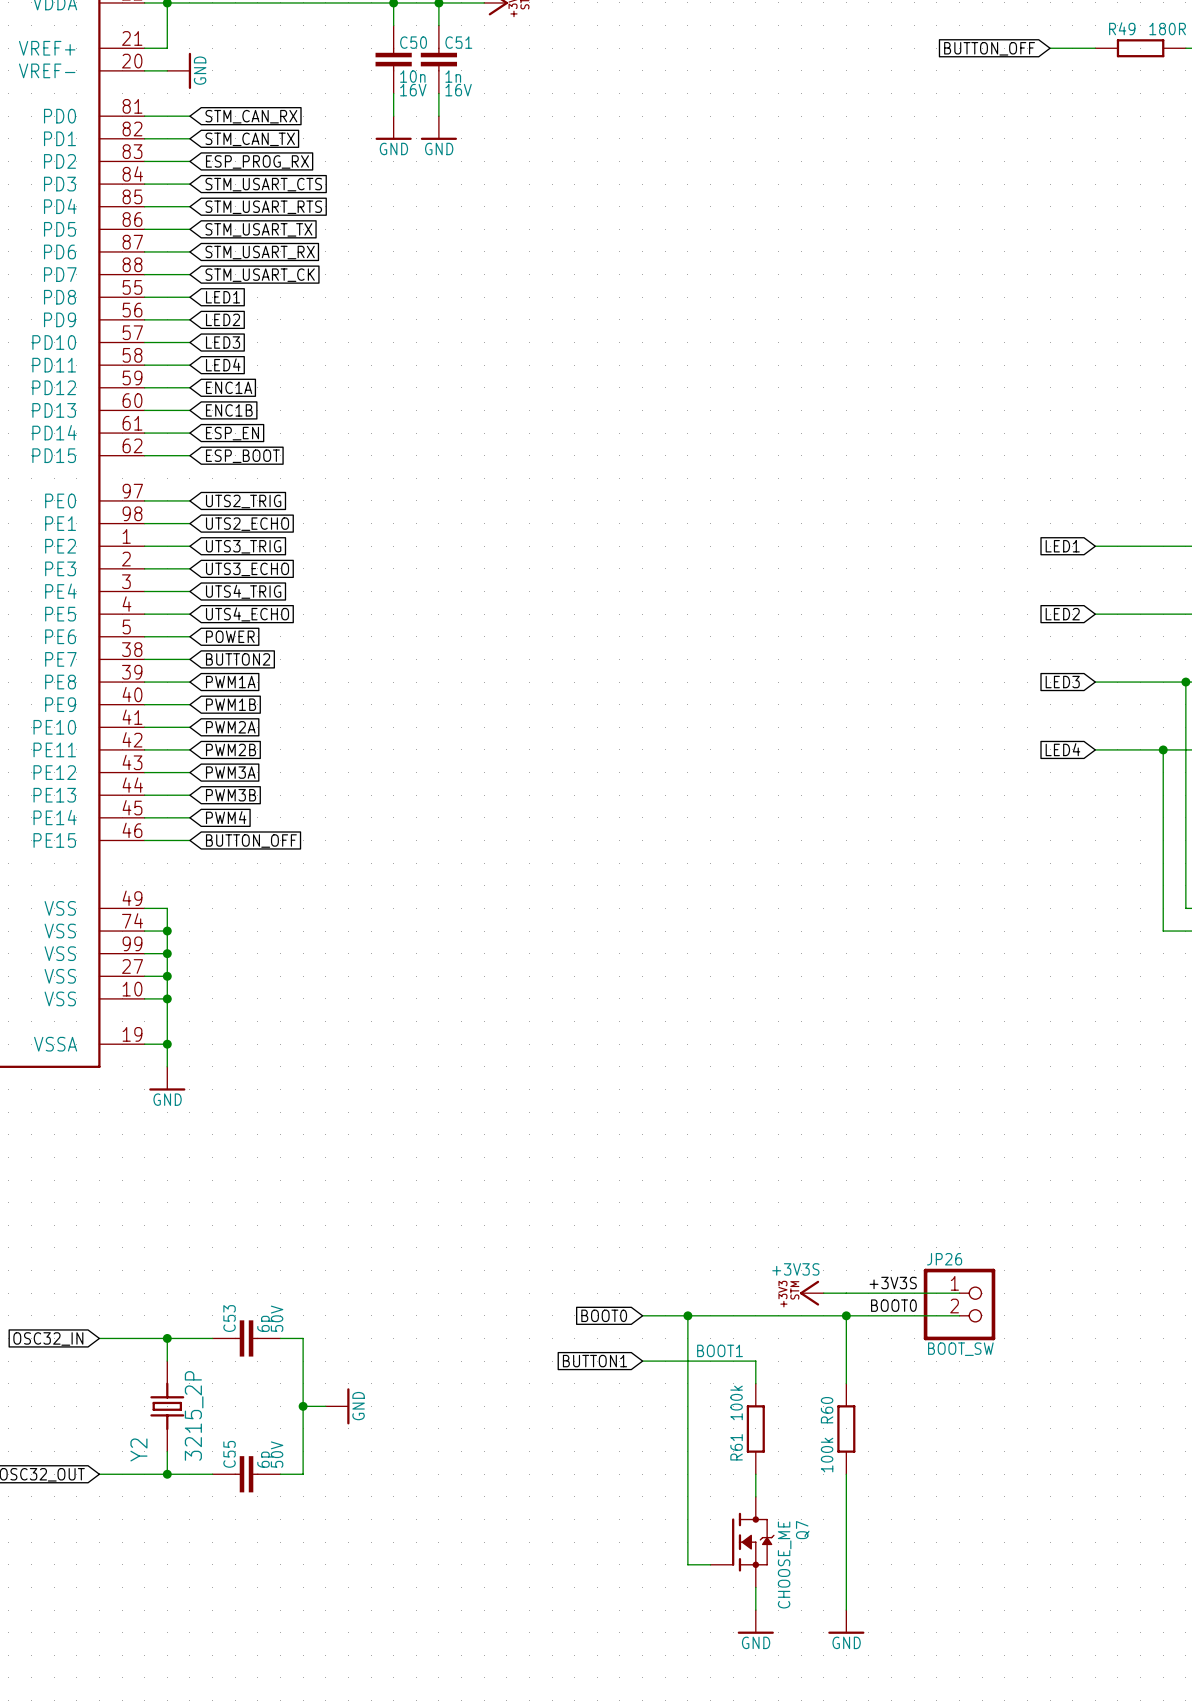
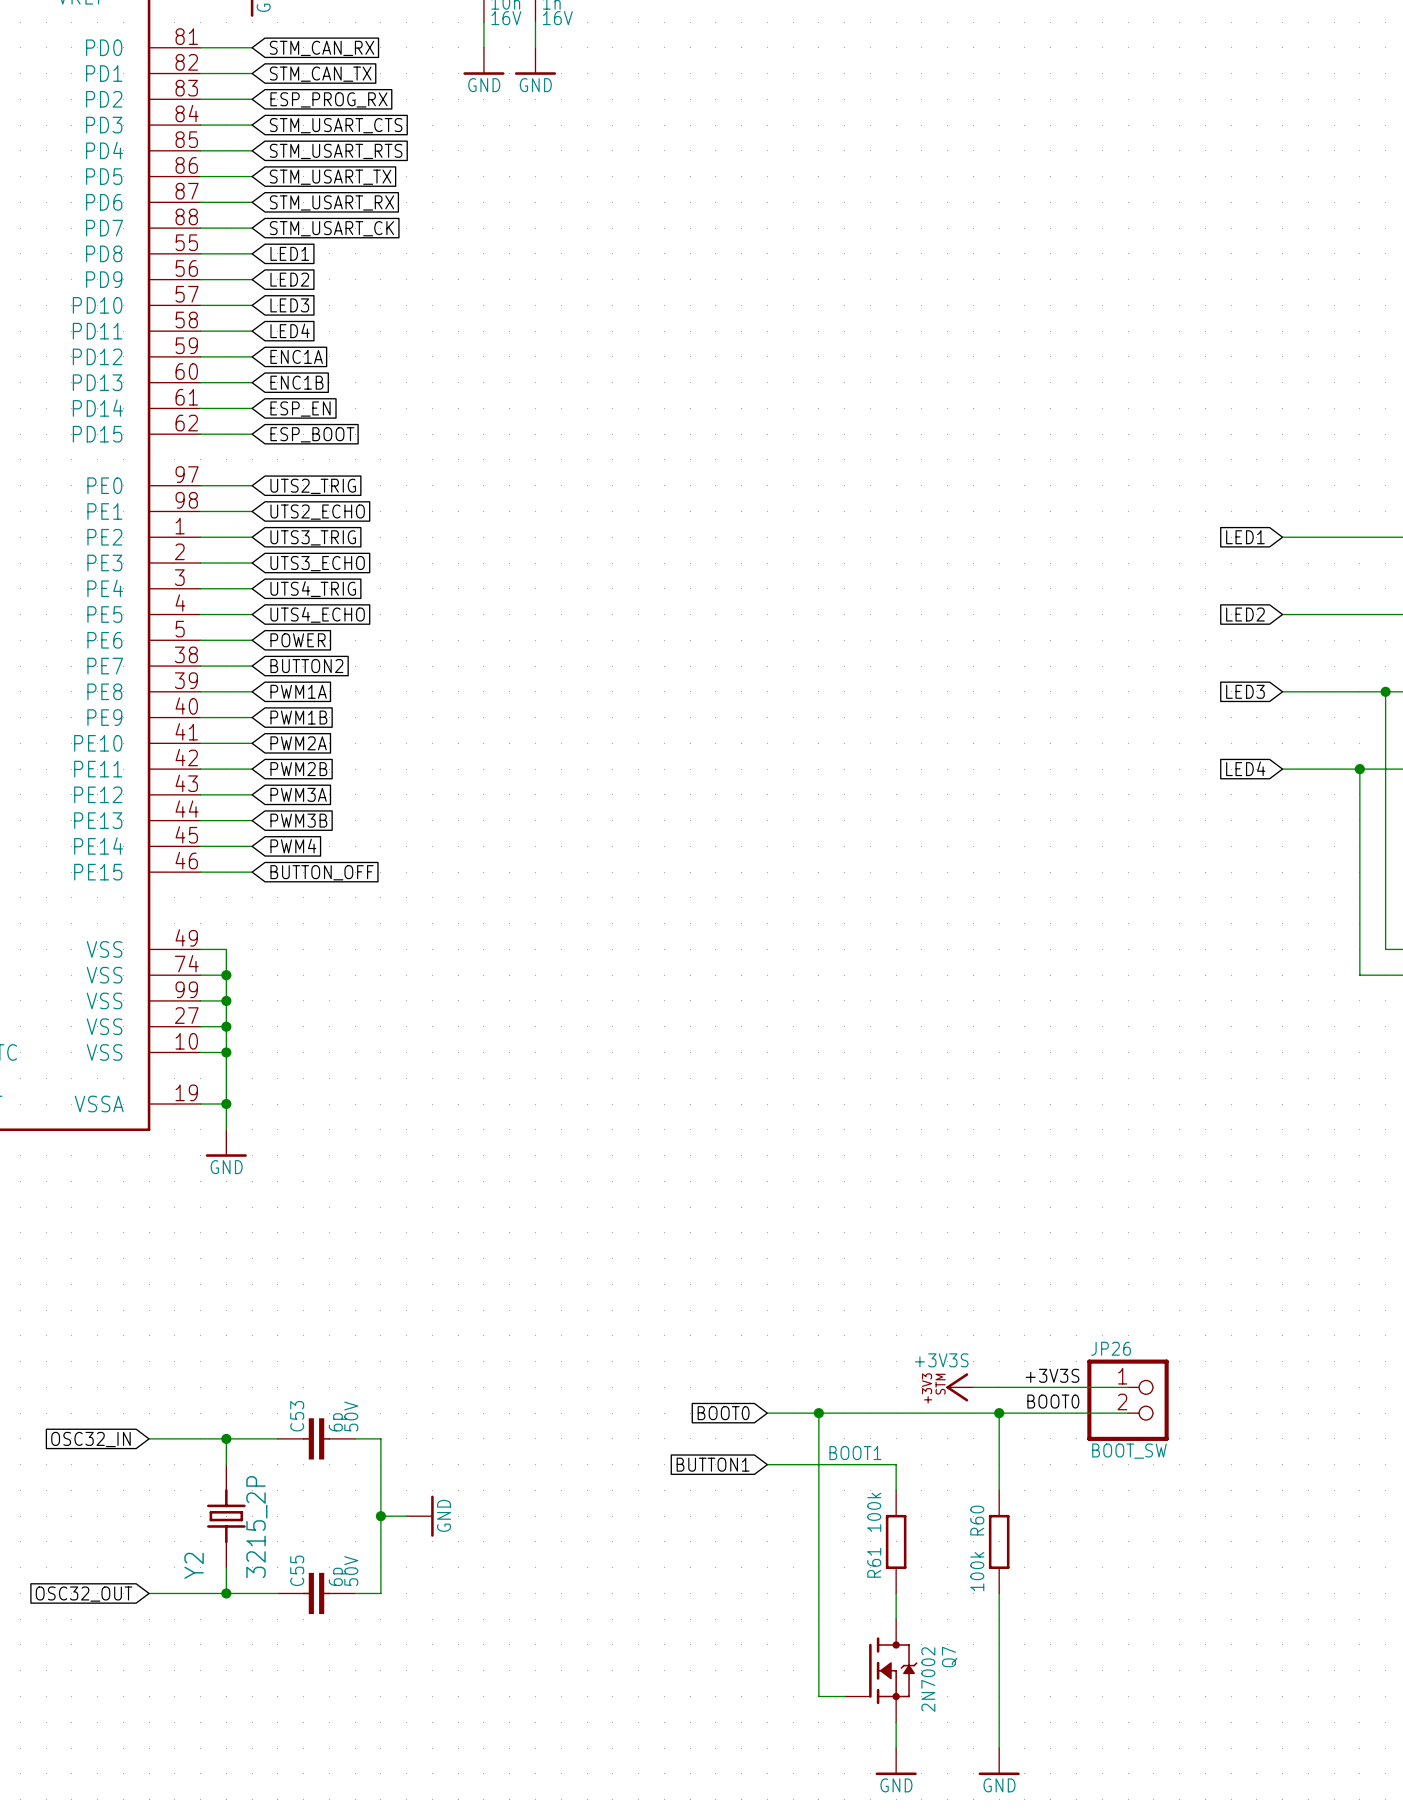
Q7 value: CHOOSE_ME (784, 1564) -> 2N7002 (928, 1679)

